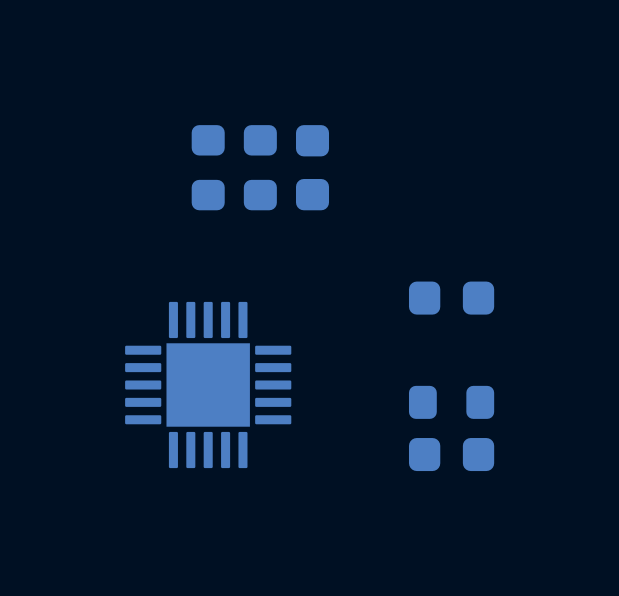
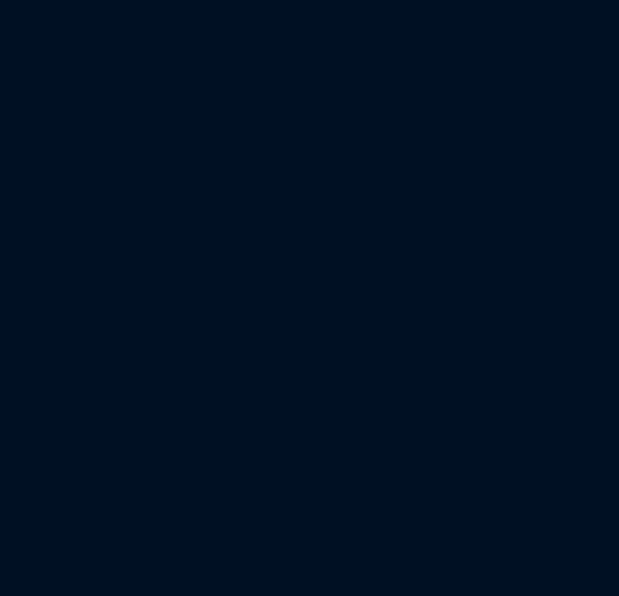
part: (208, 167) -> none
part: (260, 167) -> none
part: (312, 167) -> none
part: (451, 298) -> none
part: (208, 384) -> none
part: (451, 402) -> none
part: (451, 454) -> none

